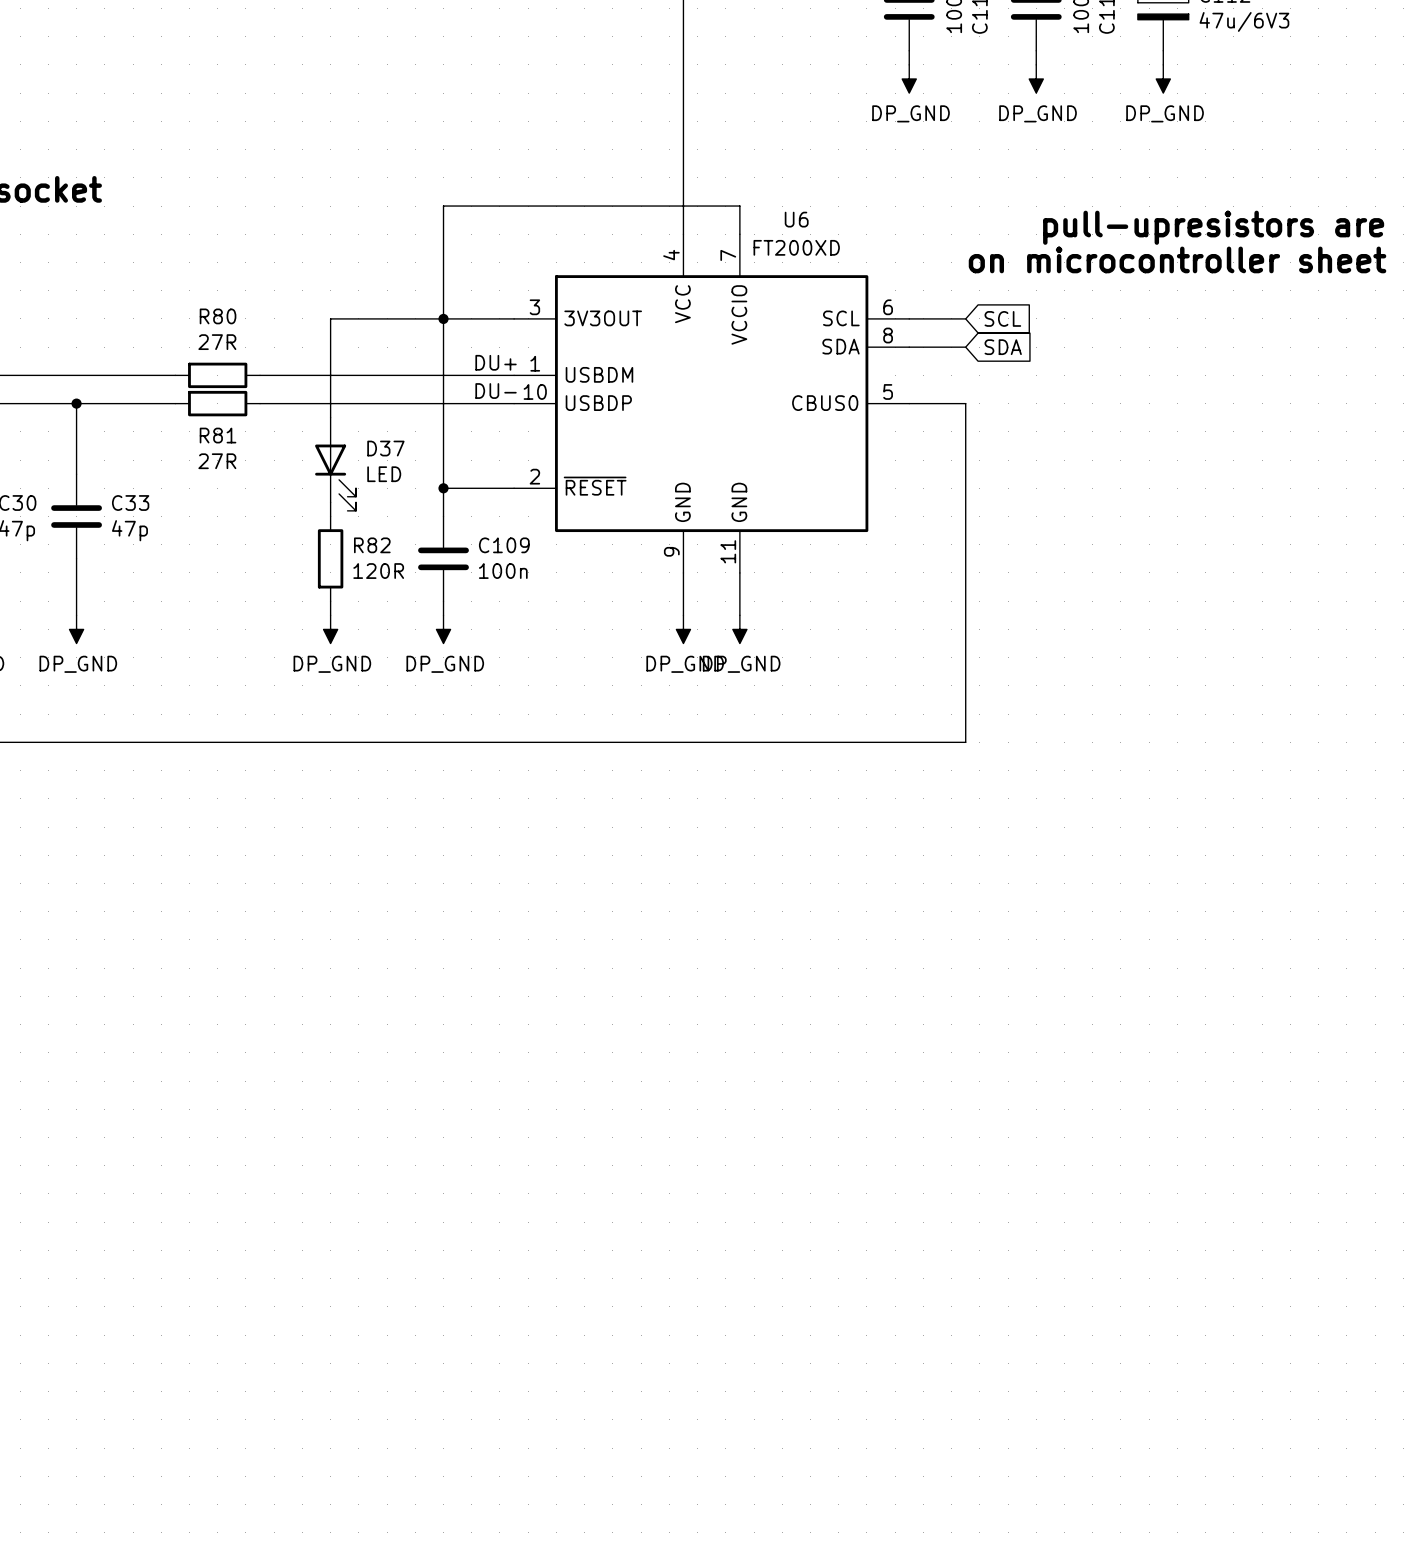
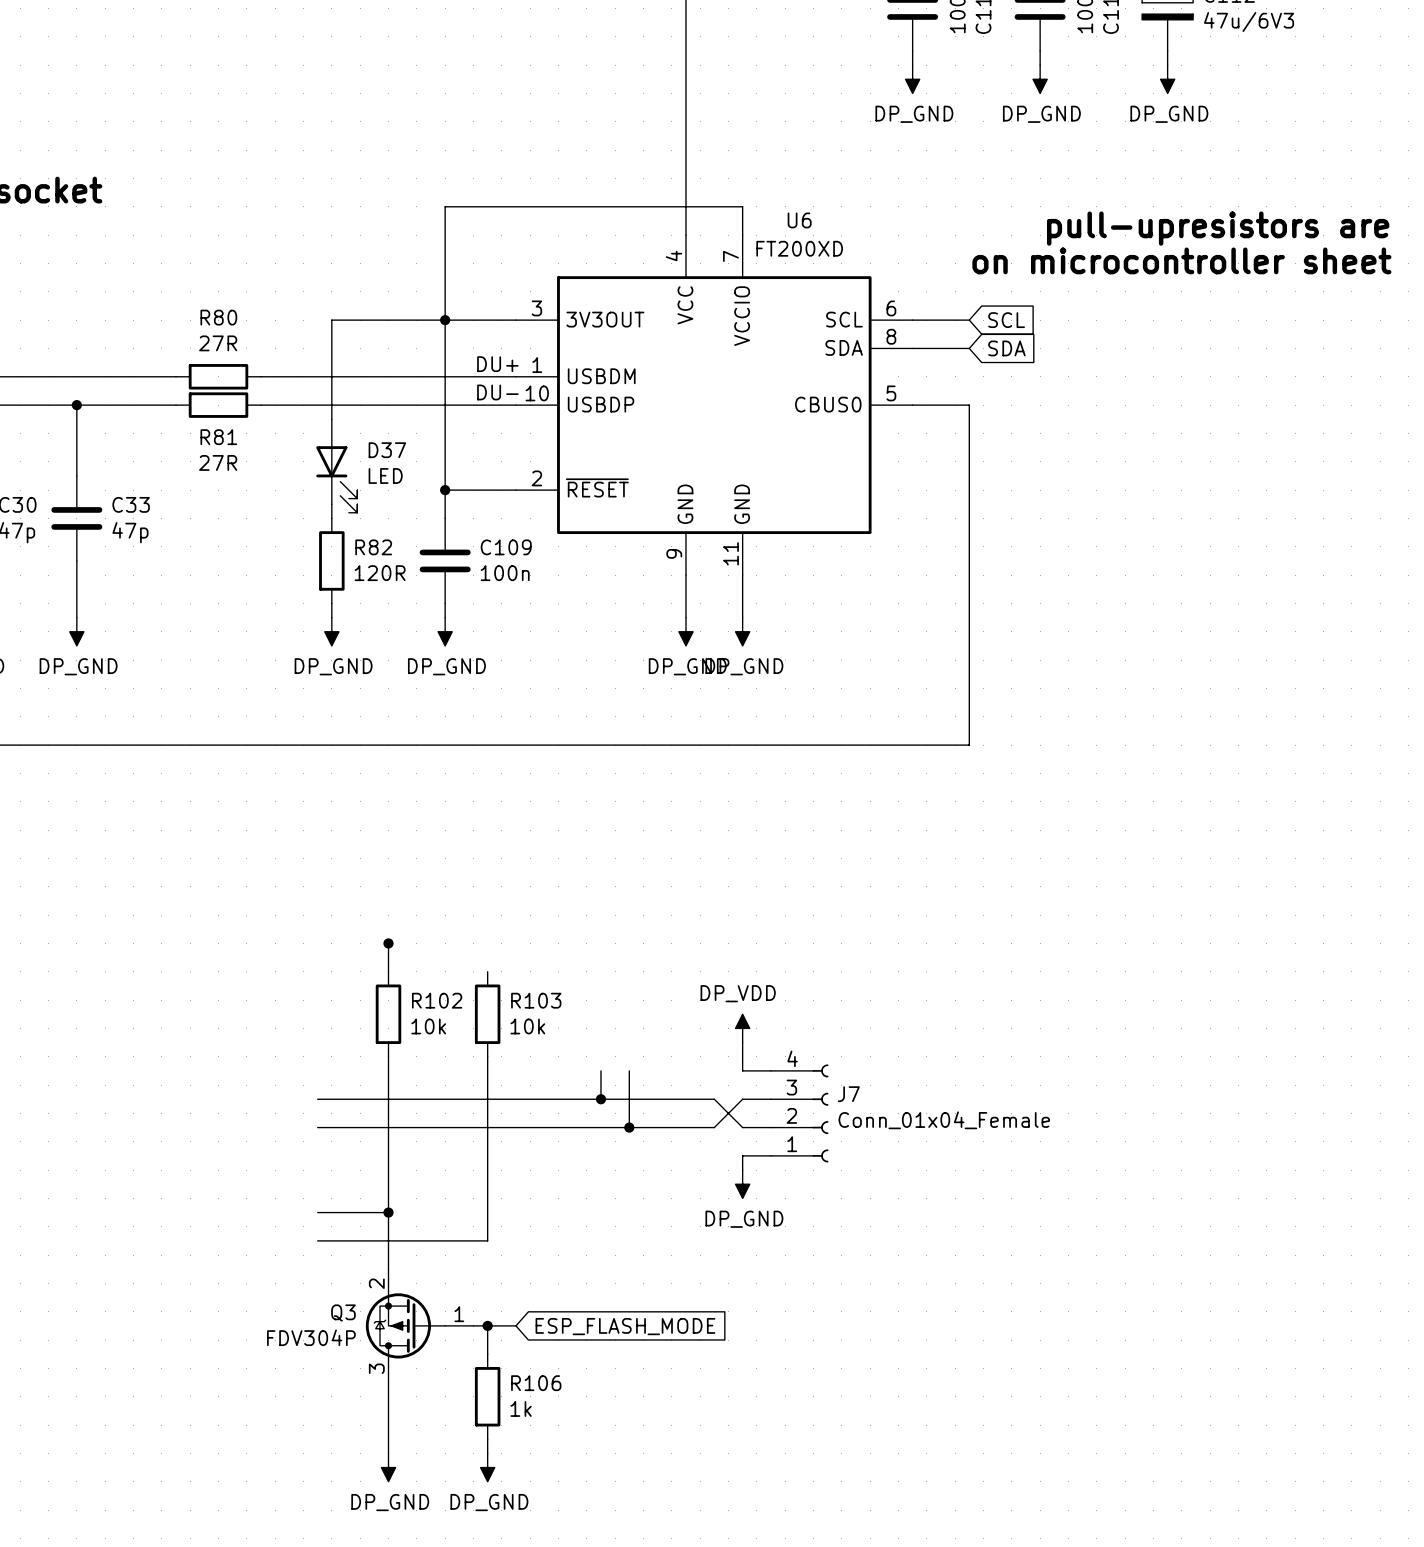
wire: none -> (388, 943) (388, 971)
junction: none -> (388, 943)
R102: none -> 10k (388, 1014)
R103: none -> 10k (487, 1014)
power symbol: none -> DP_VDD (742, 1028)
wire: none -> (742, 1042) (742, 1070) (770, 1070)
wire: none -> (388, 1056) (388, 1269)
wire: none -> (487, 1056) (487, 1240) (317, 1240)
wire: none -> (600, 1070) (600, 1099)
wire: none -> (629, 1070) (629, 1127)
wire: none -> (317, 1099) (714, 1099) (742, 1127) (770, 1127)
junction: none -> (600, 1099)
wire: none -> (770, 1099) (742, 1099) (714, 1127) (317, 1127)
J7: none -> Conn_01x04_Female (799, 1113)
junction: none -> (629, 1127)
wire: none -> (770, 1155) (742, 1155) (742, 1170)
power symbol: none -> DP_GND (742, 1184)
wire: none -> (317, 1212) (388, 1212)
junction: none -> (388, 1212)
Q3: none -> FDV304P (419, 1325)
wire: none -> (473, 1325) (515, 1325)
wire: none -> (487, 1325) (487, 1354)
junction: none -> (487, 1325)
global label: none -> ESP_FLASH_MODE (625, 1326)
wire: none -> (388, 1382) (388, 1453)
R106: none -> 1k (487, 1396)
wire: none -> (487, 1439) (487, 1453)
power symbol: none -> DP_GND (388, 1467)
power symbol: none -> DP_GND (487, 1467)

